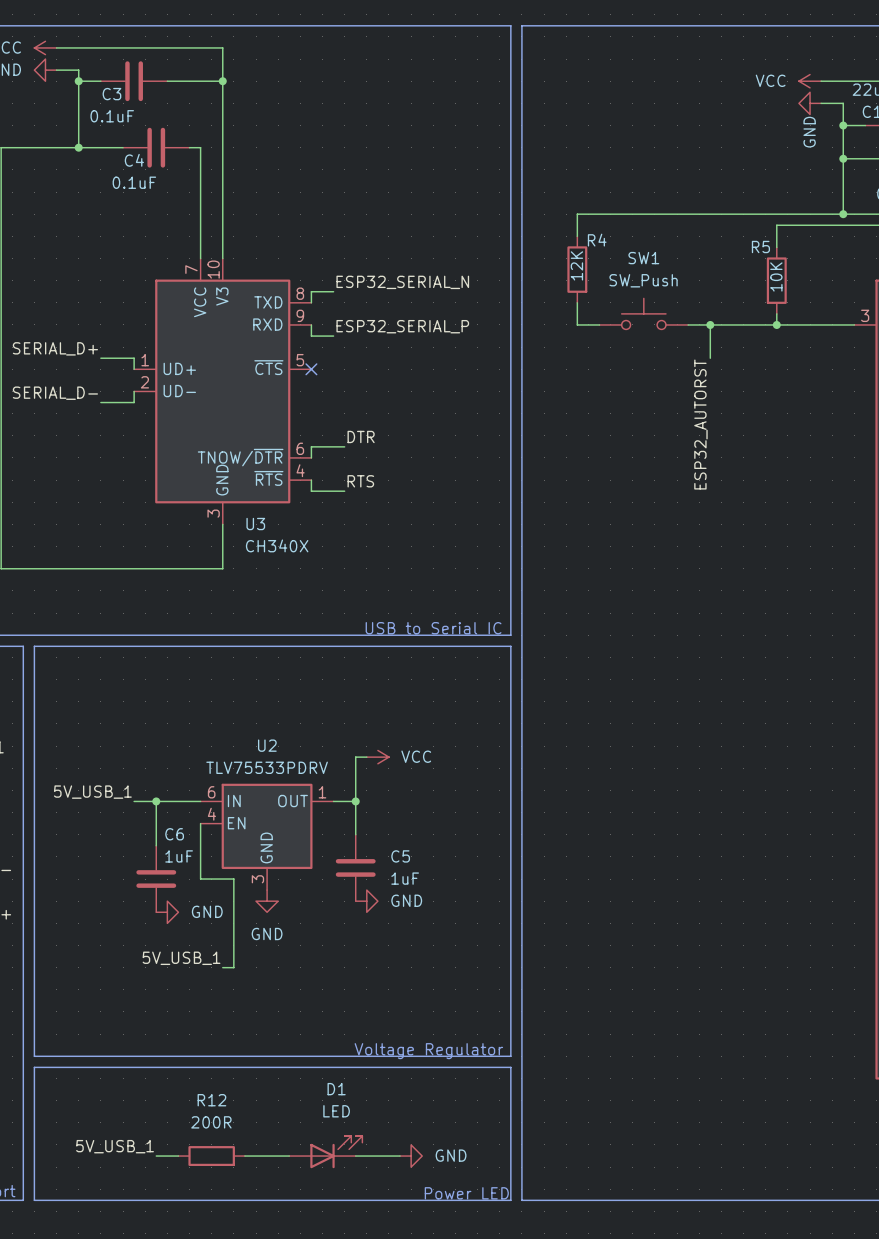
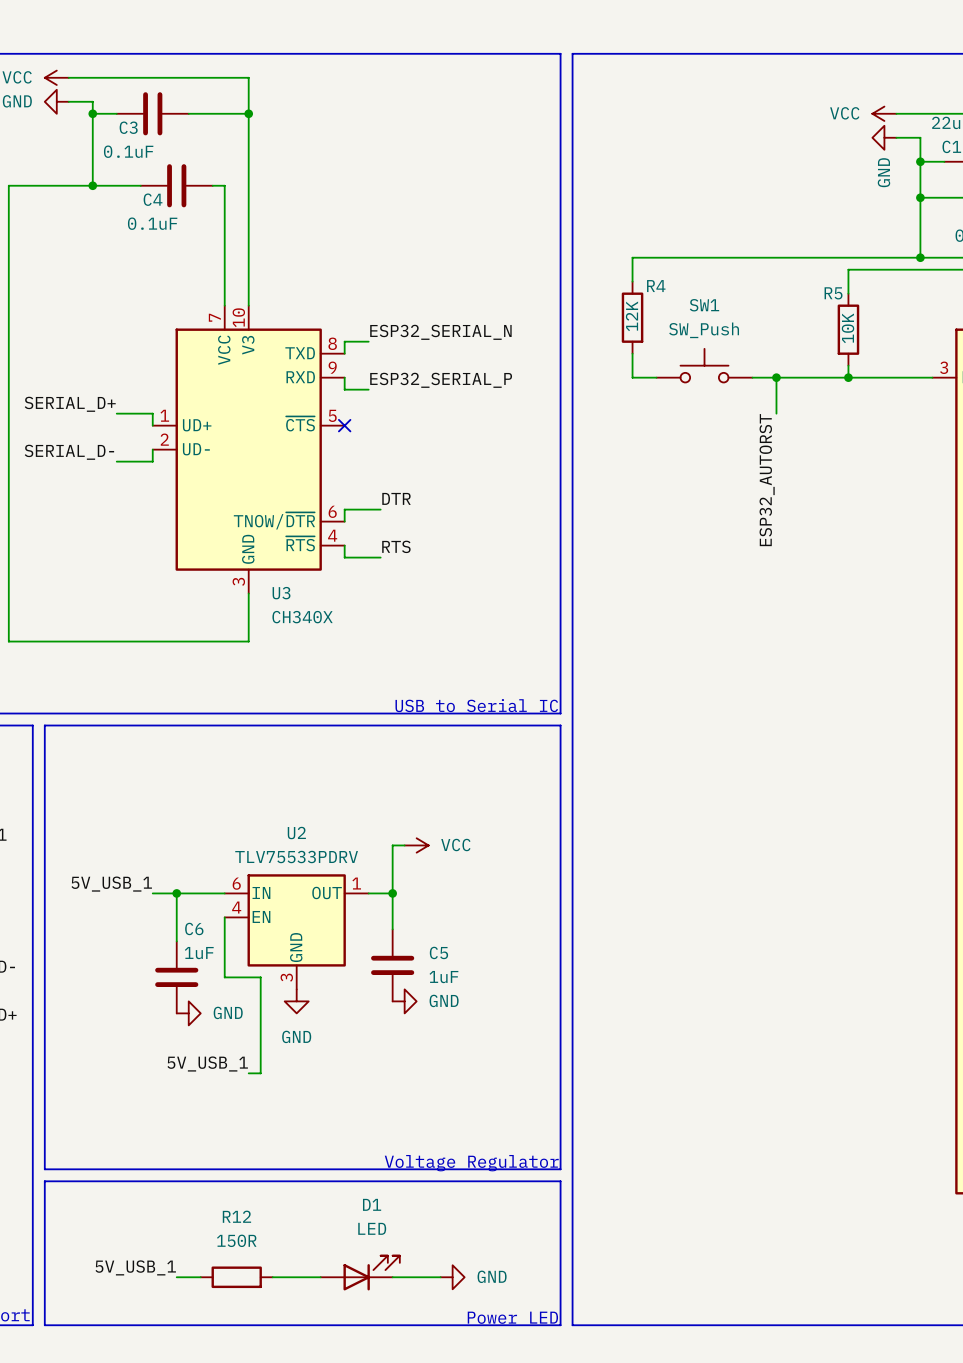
R12 value: 200R (211, 1122) -> 150R (236, 1240)

